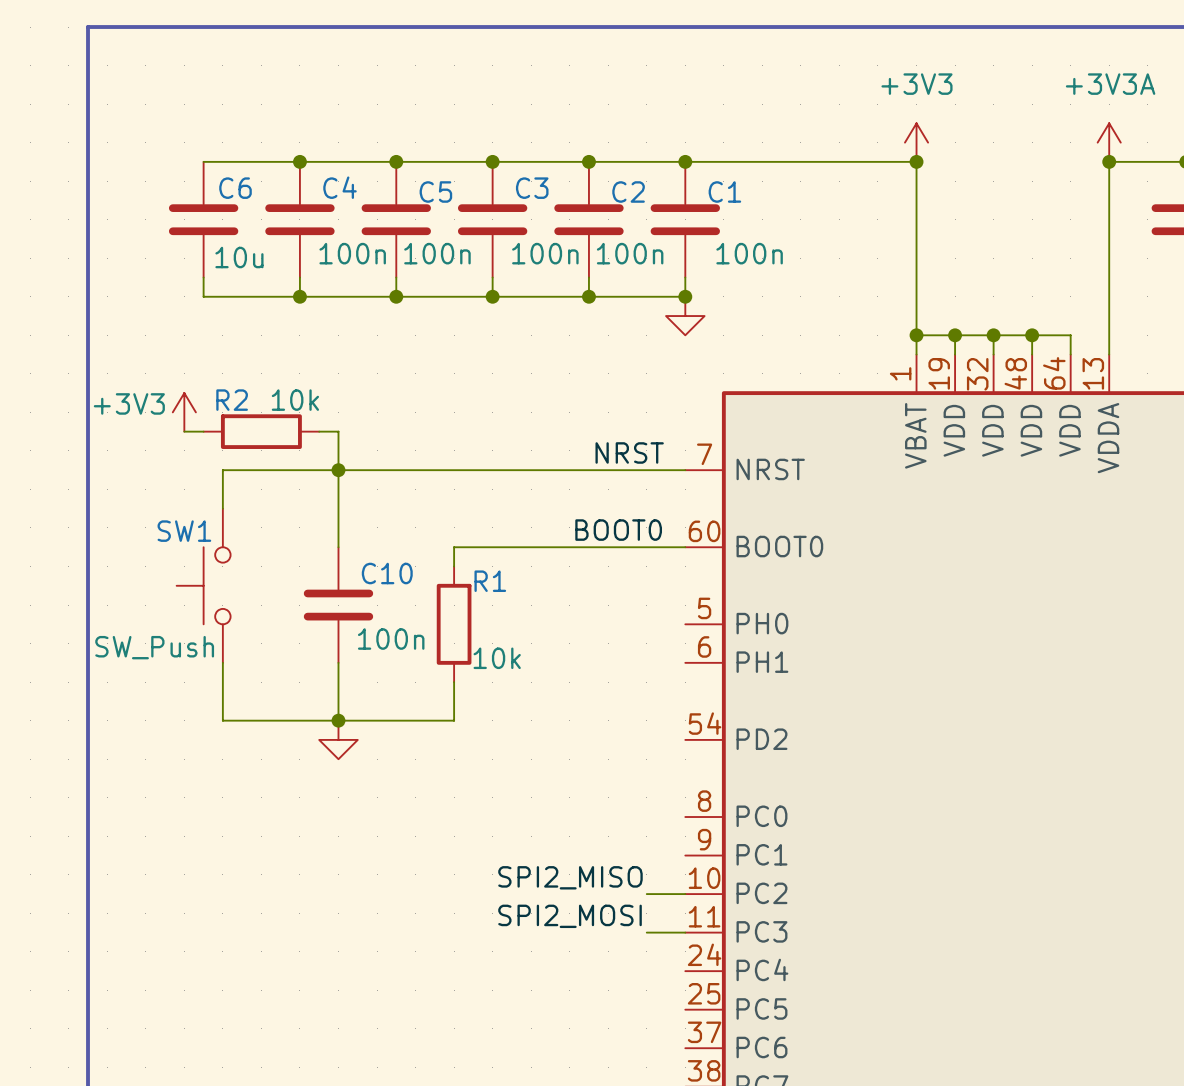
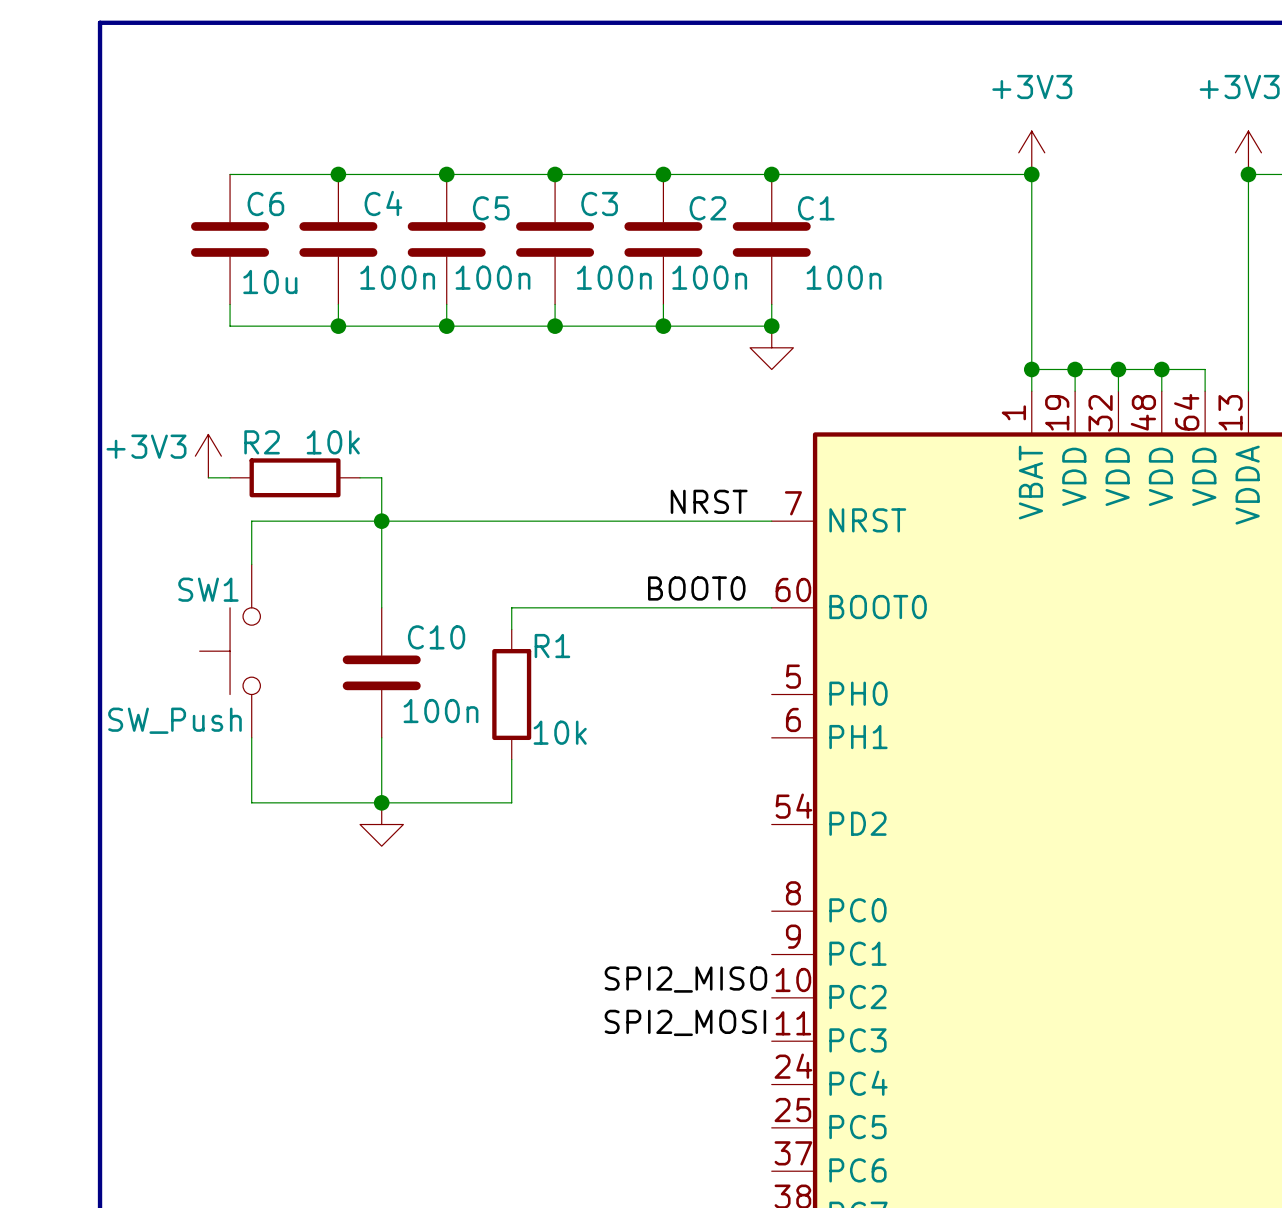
label position: SPI2_MISO (570, 877) -> SPI2_MISO (685, 979)
wire: (646, 894) (685, 894) -> none
label position: SPI2_MOSI (570, 916) -> SPI2_MOSI (685, 1022)
wire: (646, 932) (685, 932) -> none

